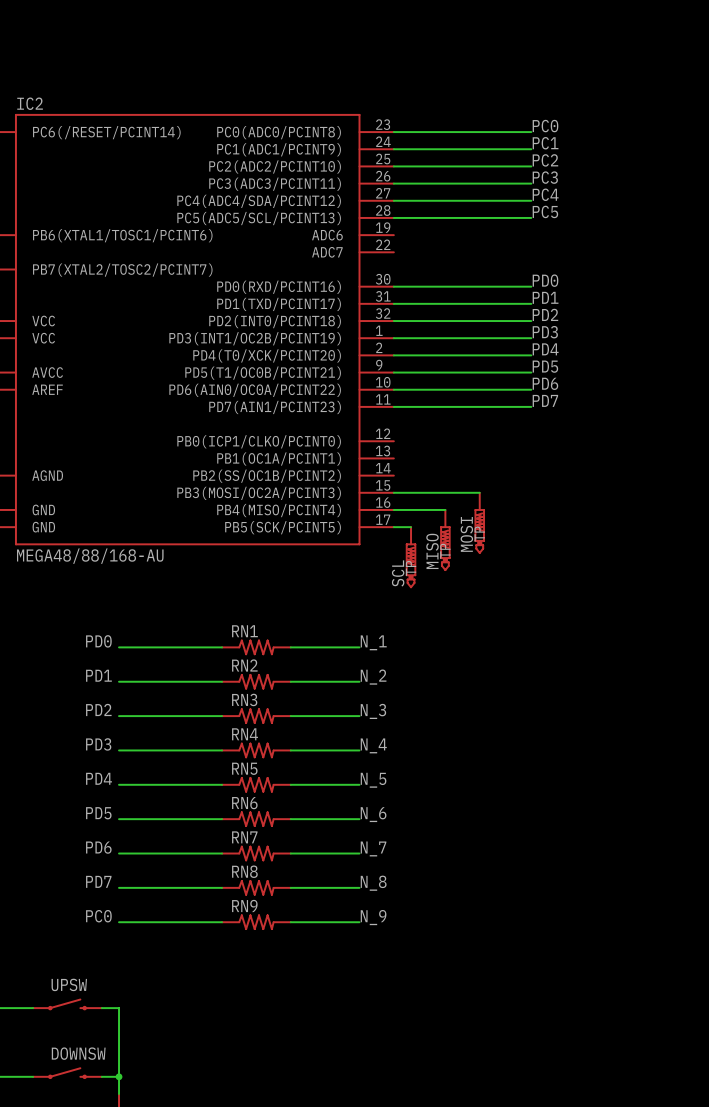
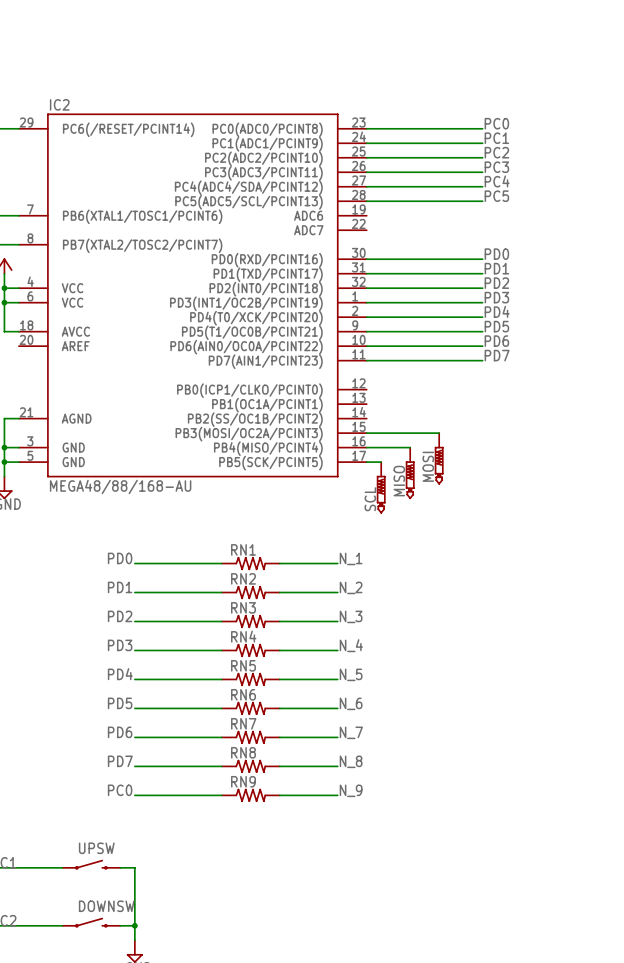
MOSI pin name: TP (479, 534) -> none
MISO pin name: TP (445, 551) -> none
SCL pin name: TP (411, 568) -> none

